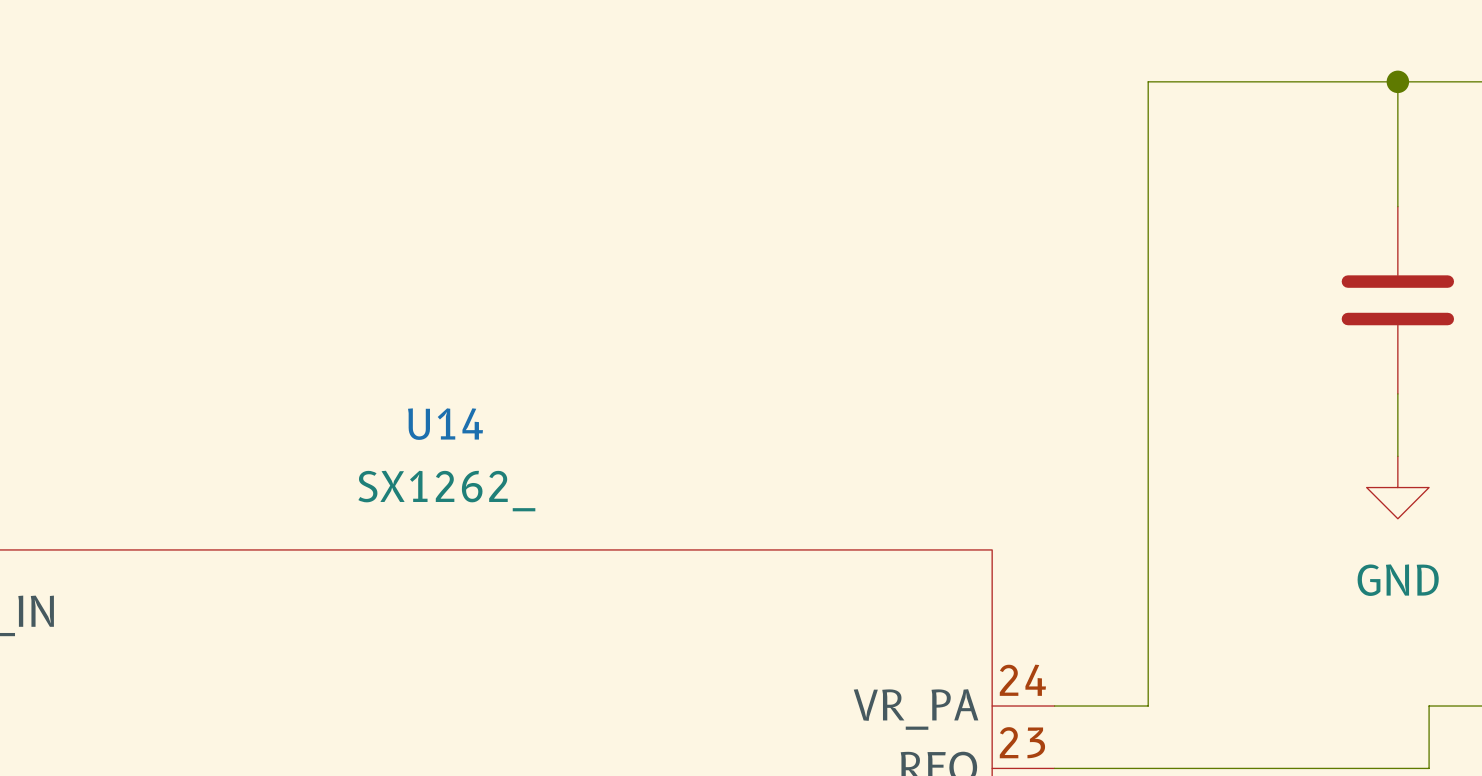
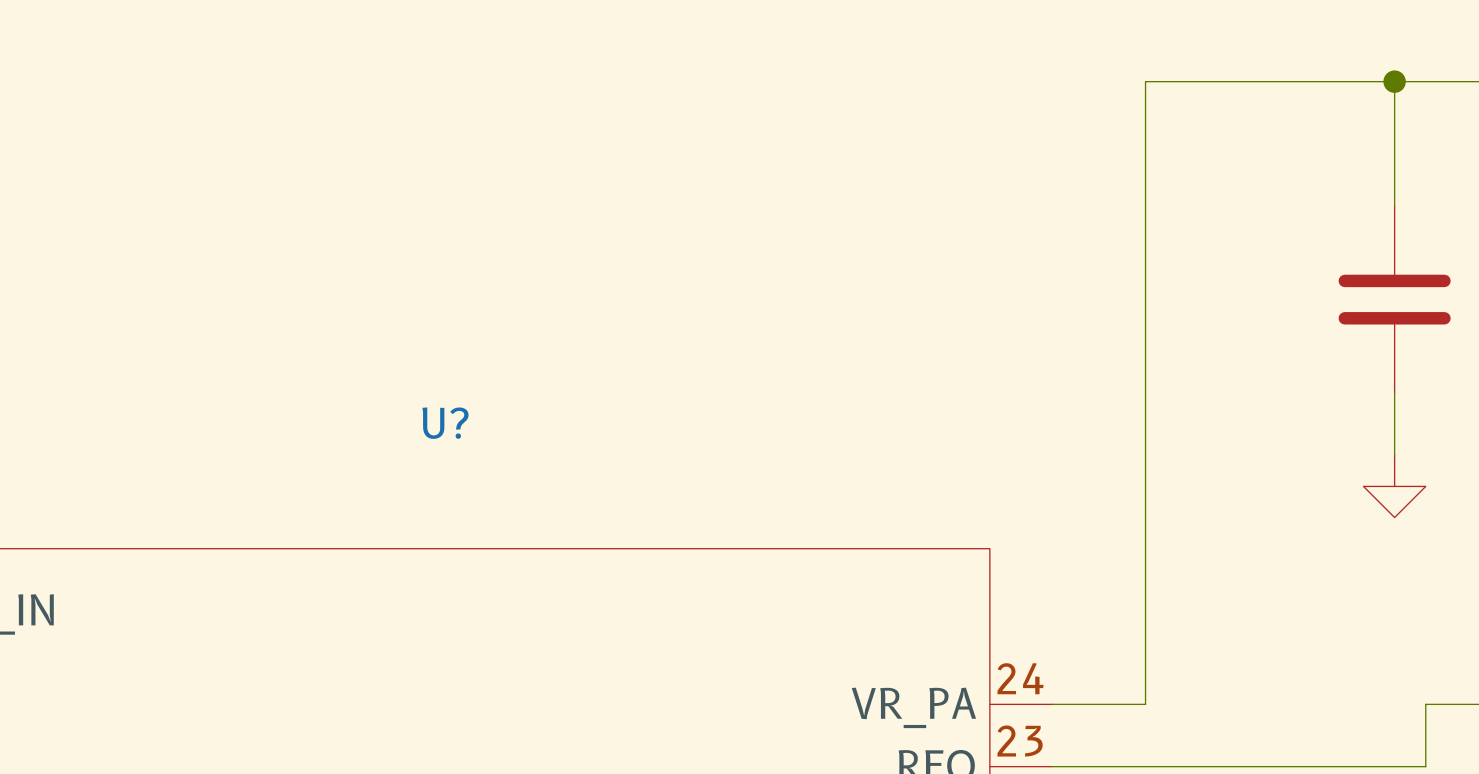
U14 name: U14 (445, 424) -> U? (445, 423)
U14 value: SX1262_ (446, 491) -> none
power symbol text: GND (1398, 580) -> none

